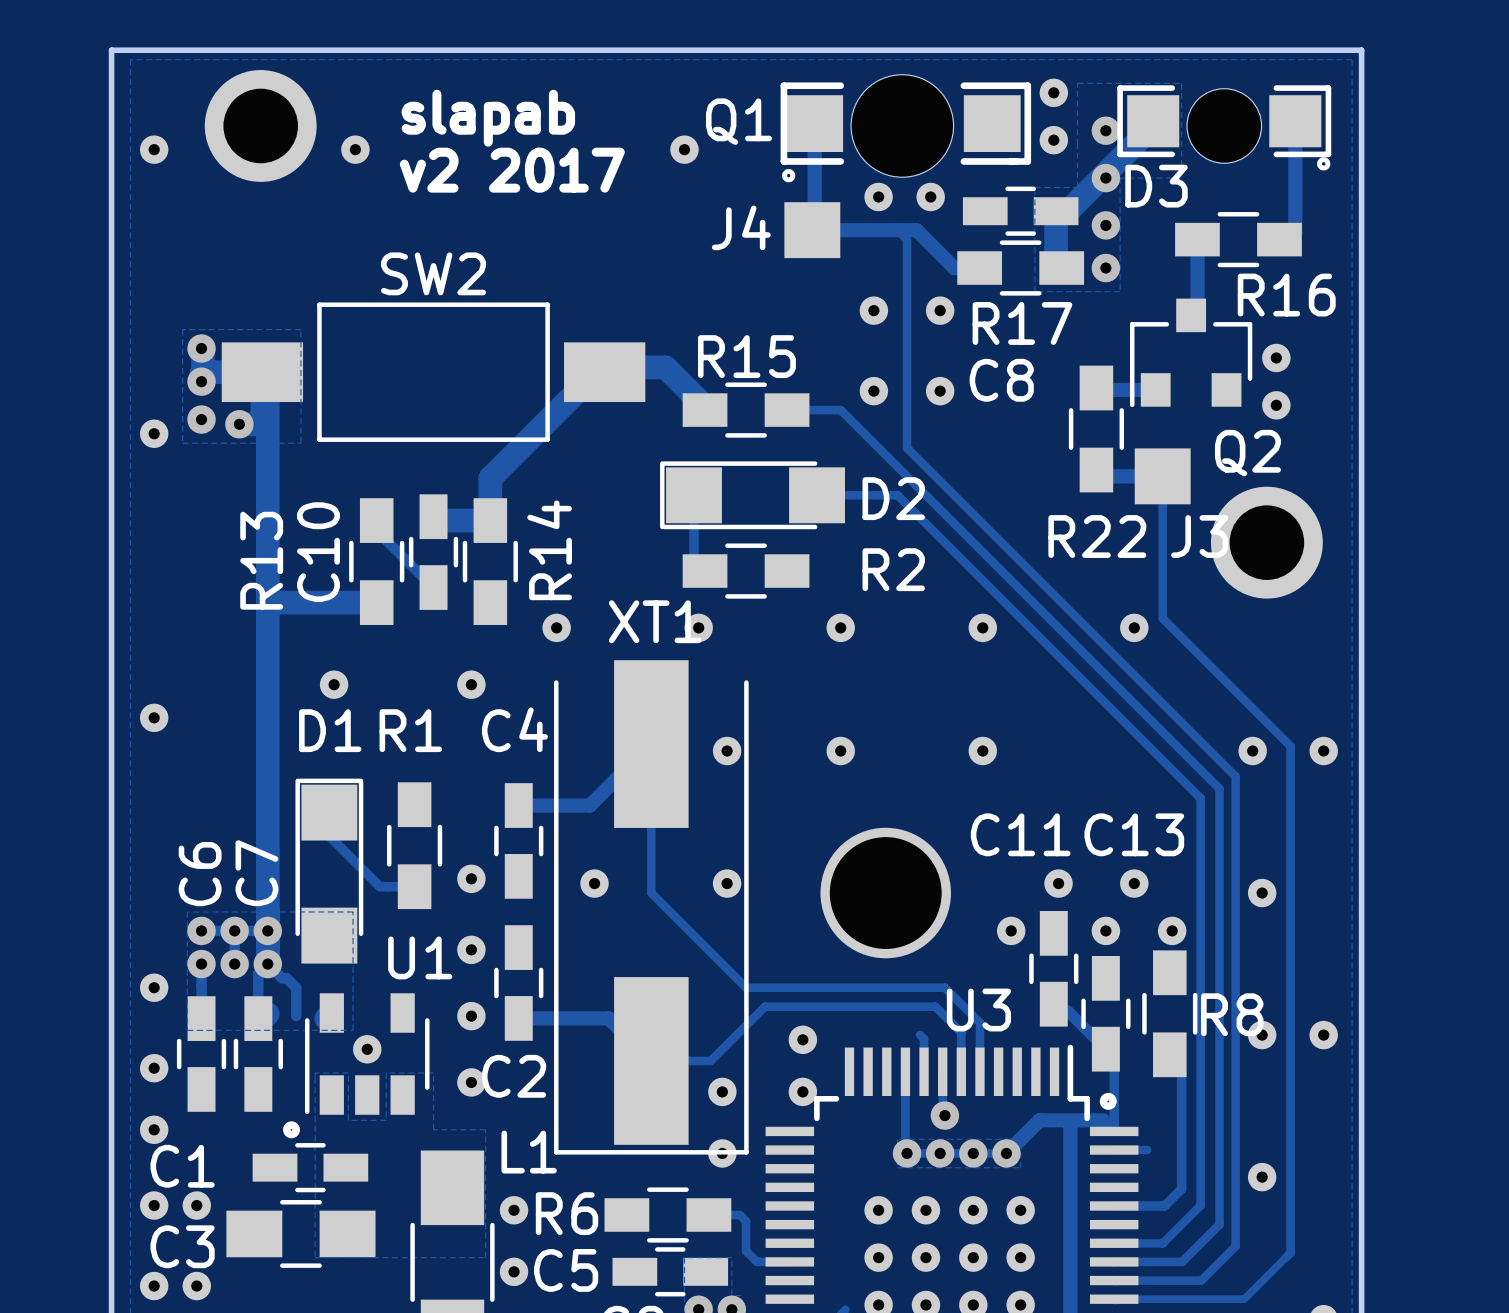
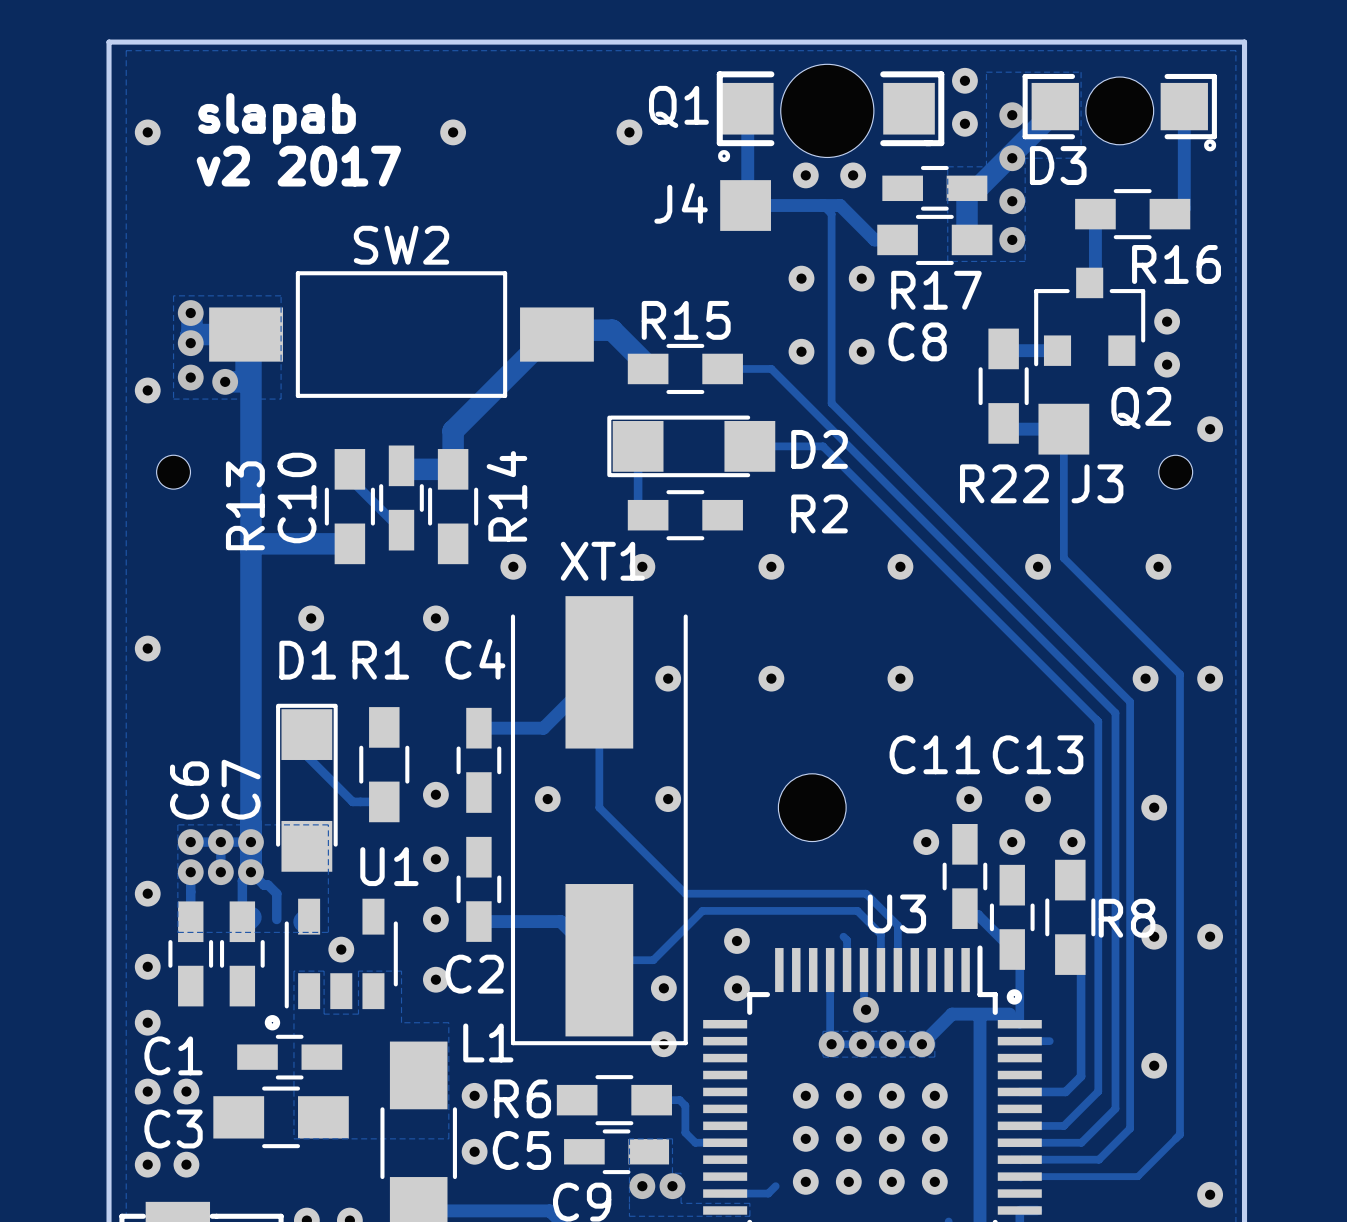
text position: slapab (488, 118) -> slapab (277, 118)
part: (260, 125) -> none
part position: (355, 149) -> (453, 132)
text position: v2 2017 (512, 170) -> v2 2017 (298, 166)
part: none -> (1210, 429)
part footprint: [1210, 486, 1323, 599] -> [1158, 455, 1193, 490]
part: none -> (173, 472)
part: none -> (1158, 566)
part footprint: [820, 827, 951, 959] -> [778, 773, 847, 842]

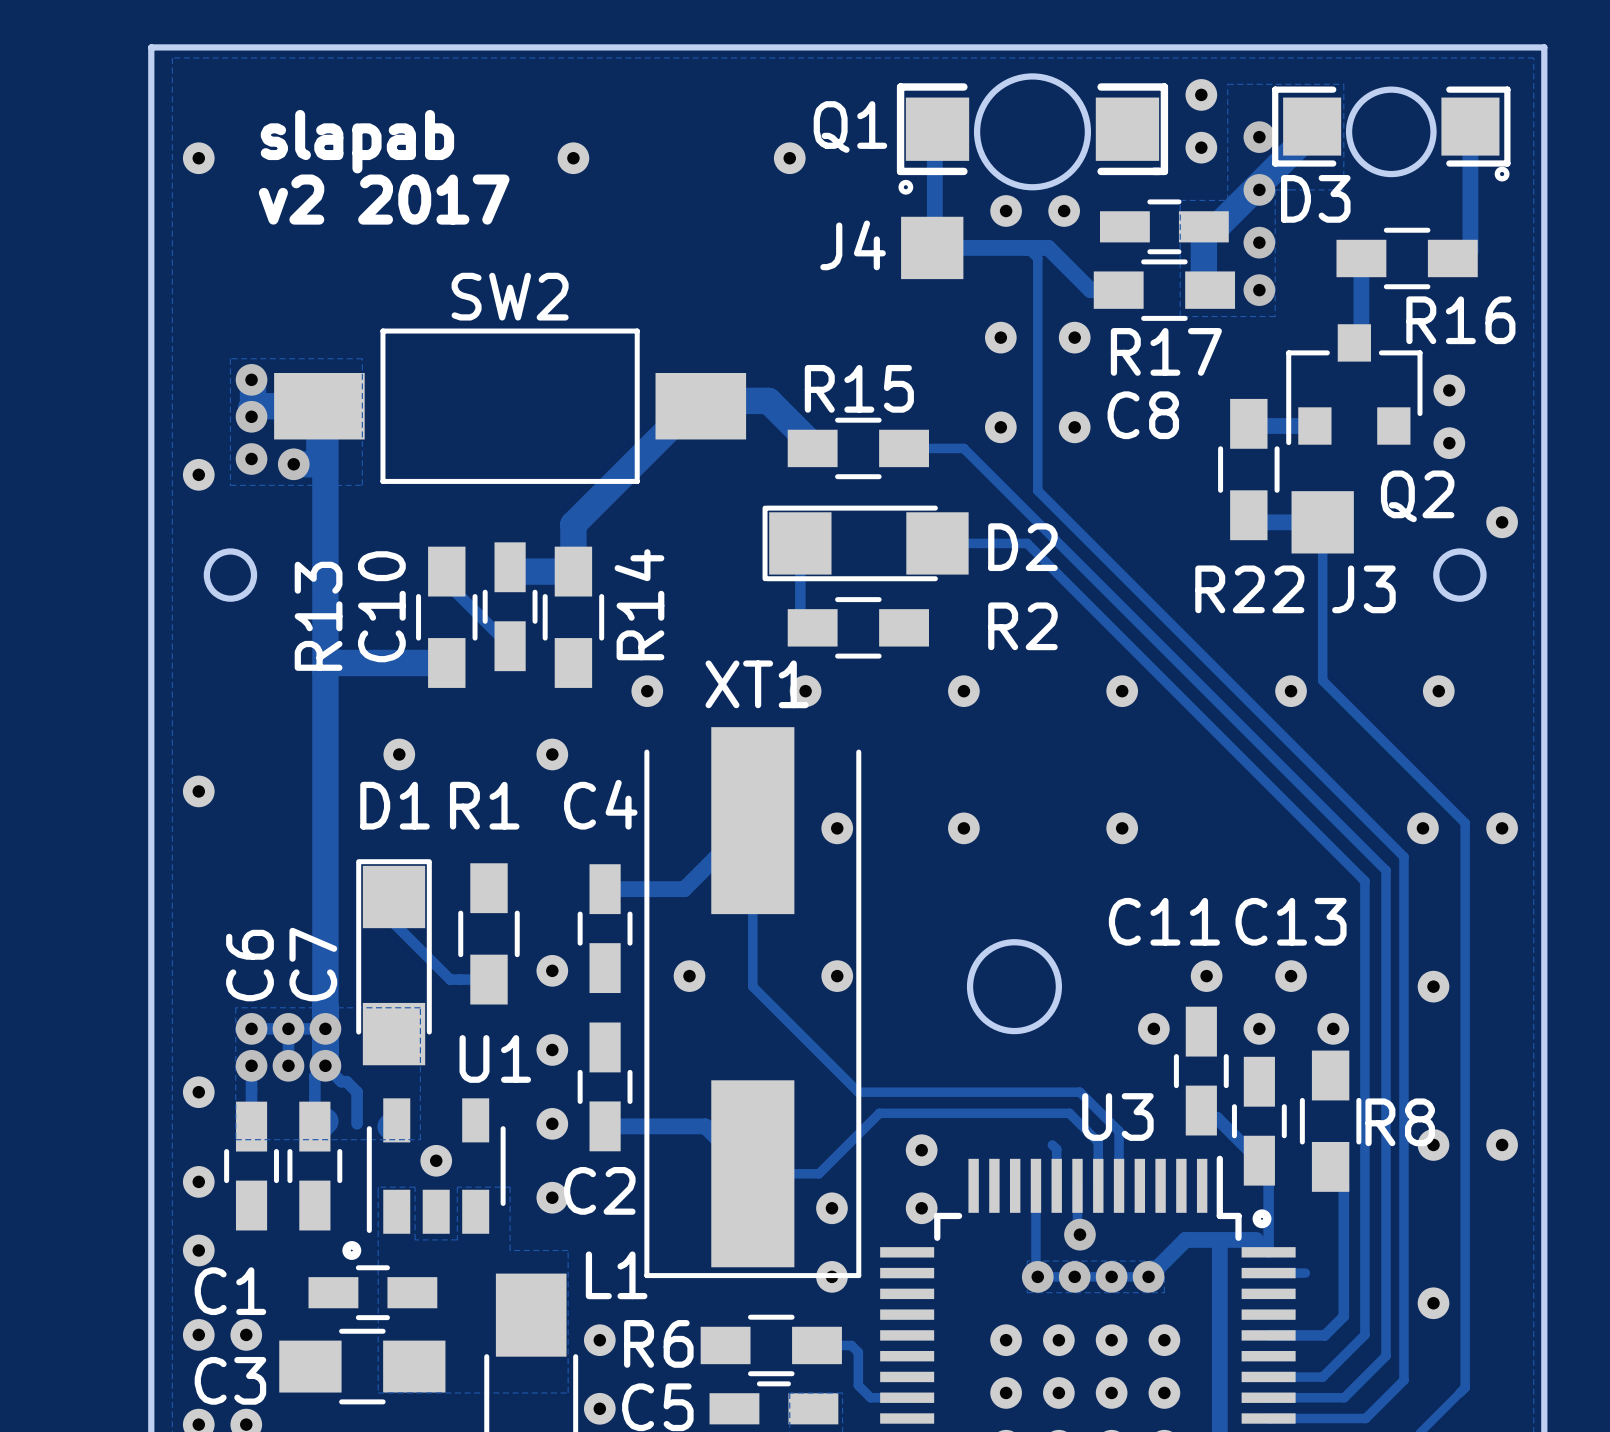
round board edge: none -> [973, 73, 1092, 191]
Q1 footprint: [716, 71, 945, 163] -> [896, 83, 1169, 195]
round board edge: none -> [1345, 86, 1437, 178]
part: (827, 110) -> none
part: (1119, 110) -> none
round board edge: none -> [203, 548, 258, 602]
round board edge: none -> [1433, 548, 1487, 602]
part: (173, 472) -> none
part: (1175, 472) -> none
round board edge: none -> [966, 939, 1062, 1035]
part: (812, 807) -> none

